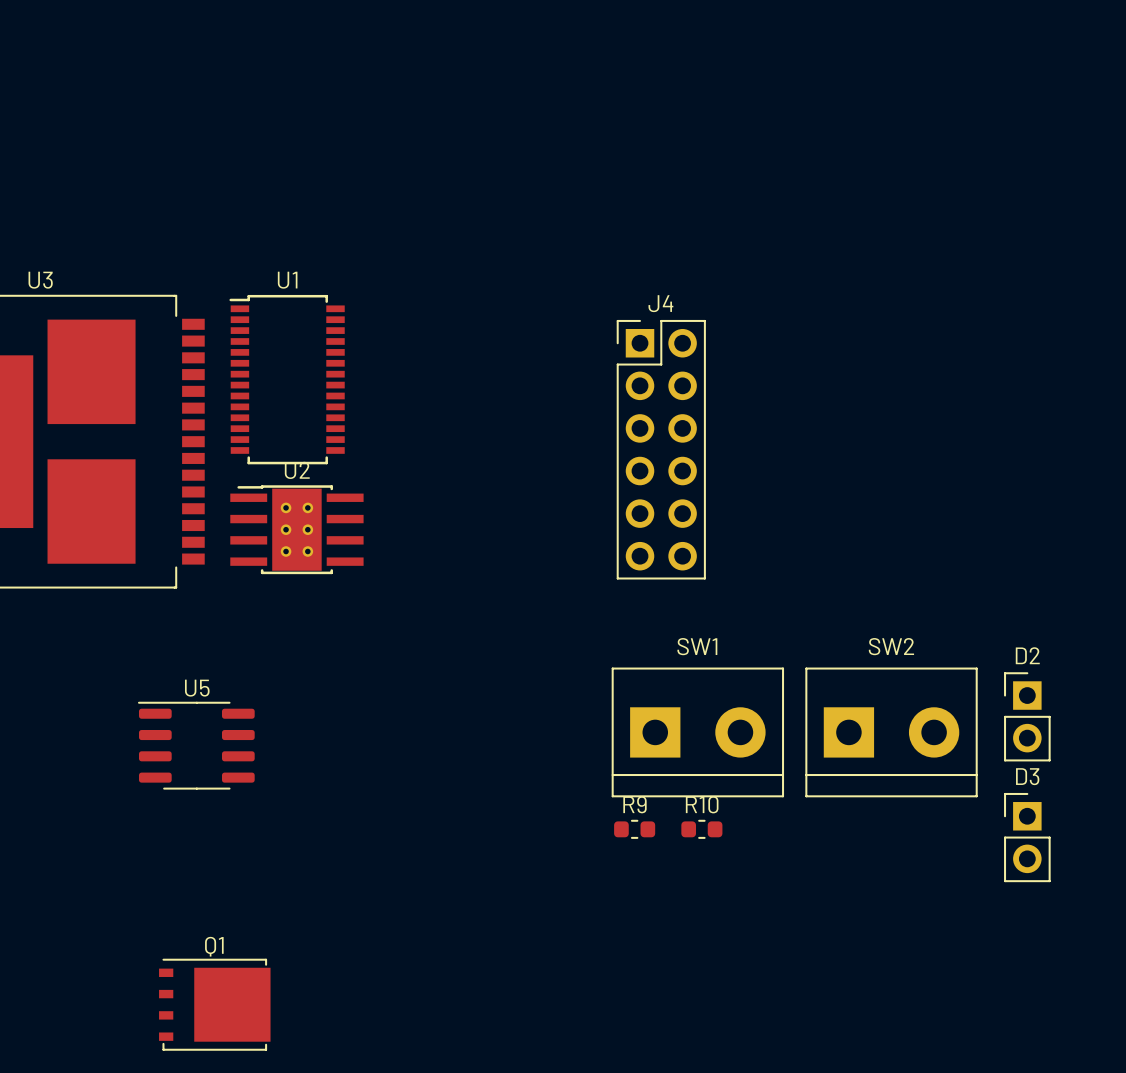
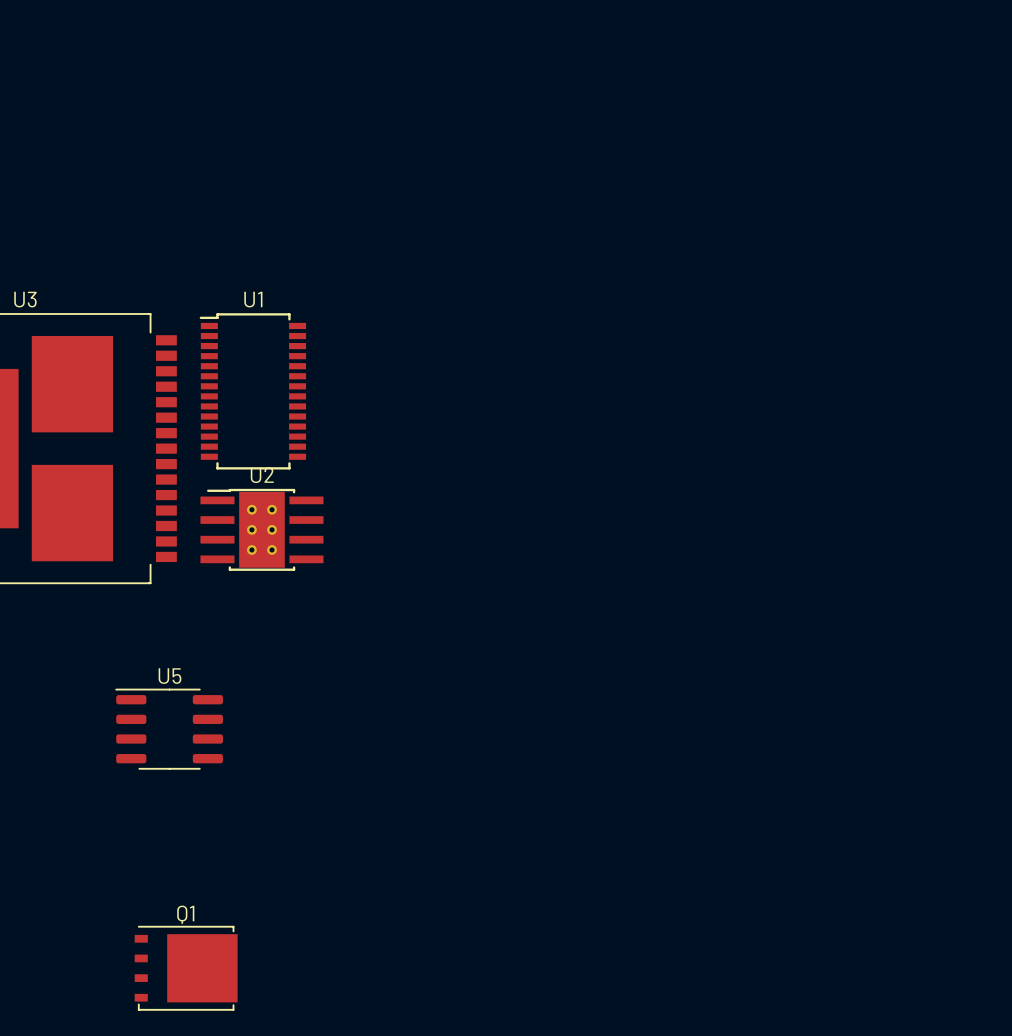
J4: (661, 449) -> none
D2: (1027, 716) -> none
SW1: (697, 732) -> none
SW2: (891, 732) -> none
R9: (634, 829) -> none
R10: (701, 829) -> none
D3: (1027, 837) -> none

